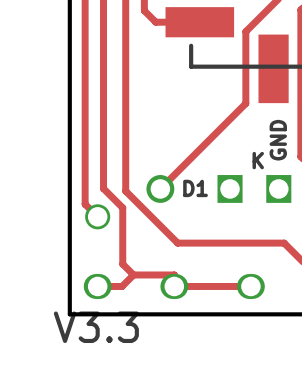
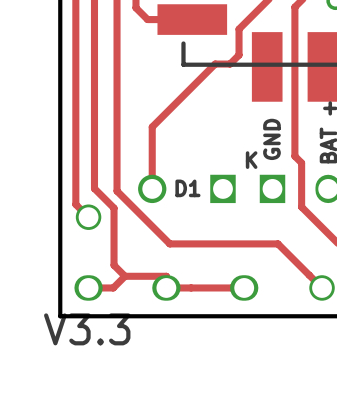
track: (245, 57) (245, 103) (160, 188) -> (239, 55) (230, 64) (215, 64) (152, 127) (152, 188)

